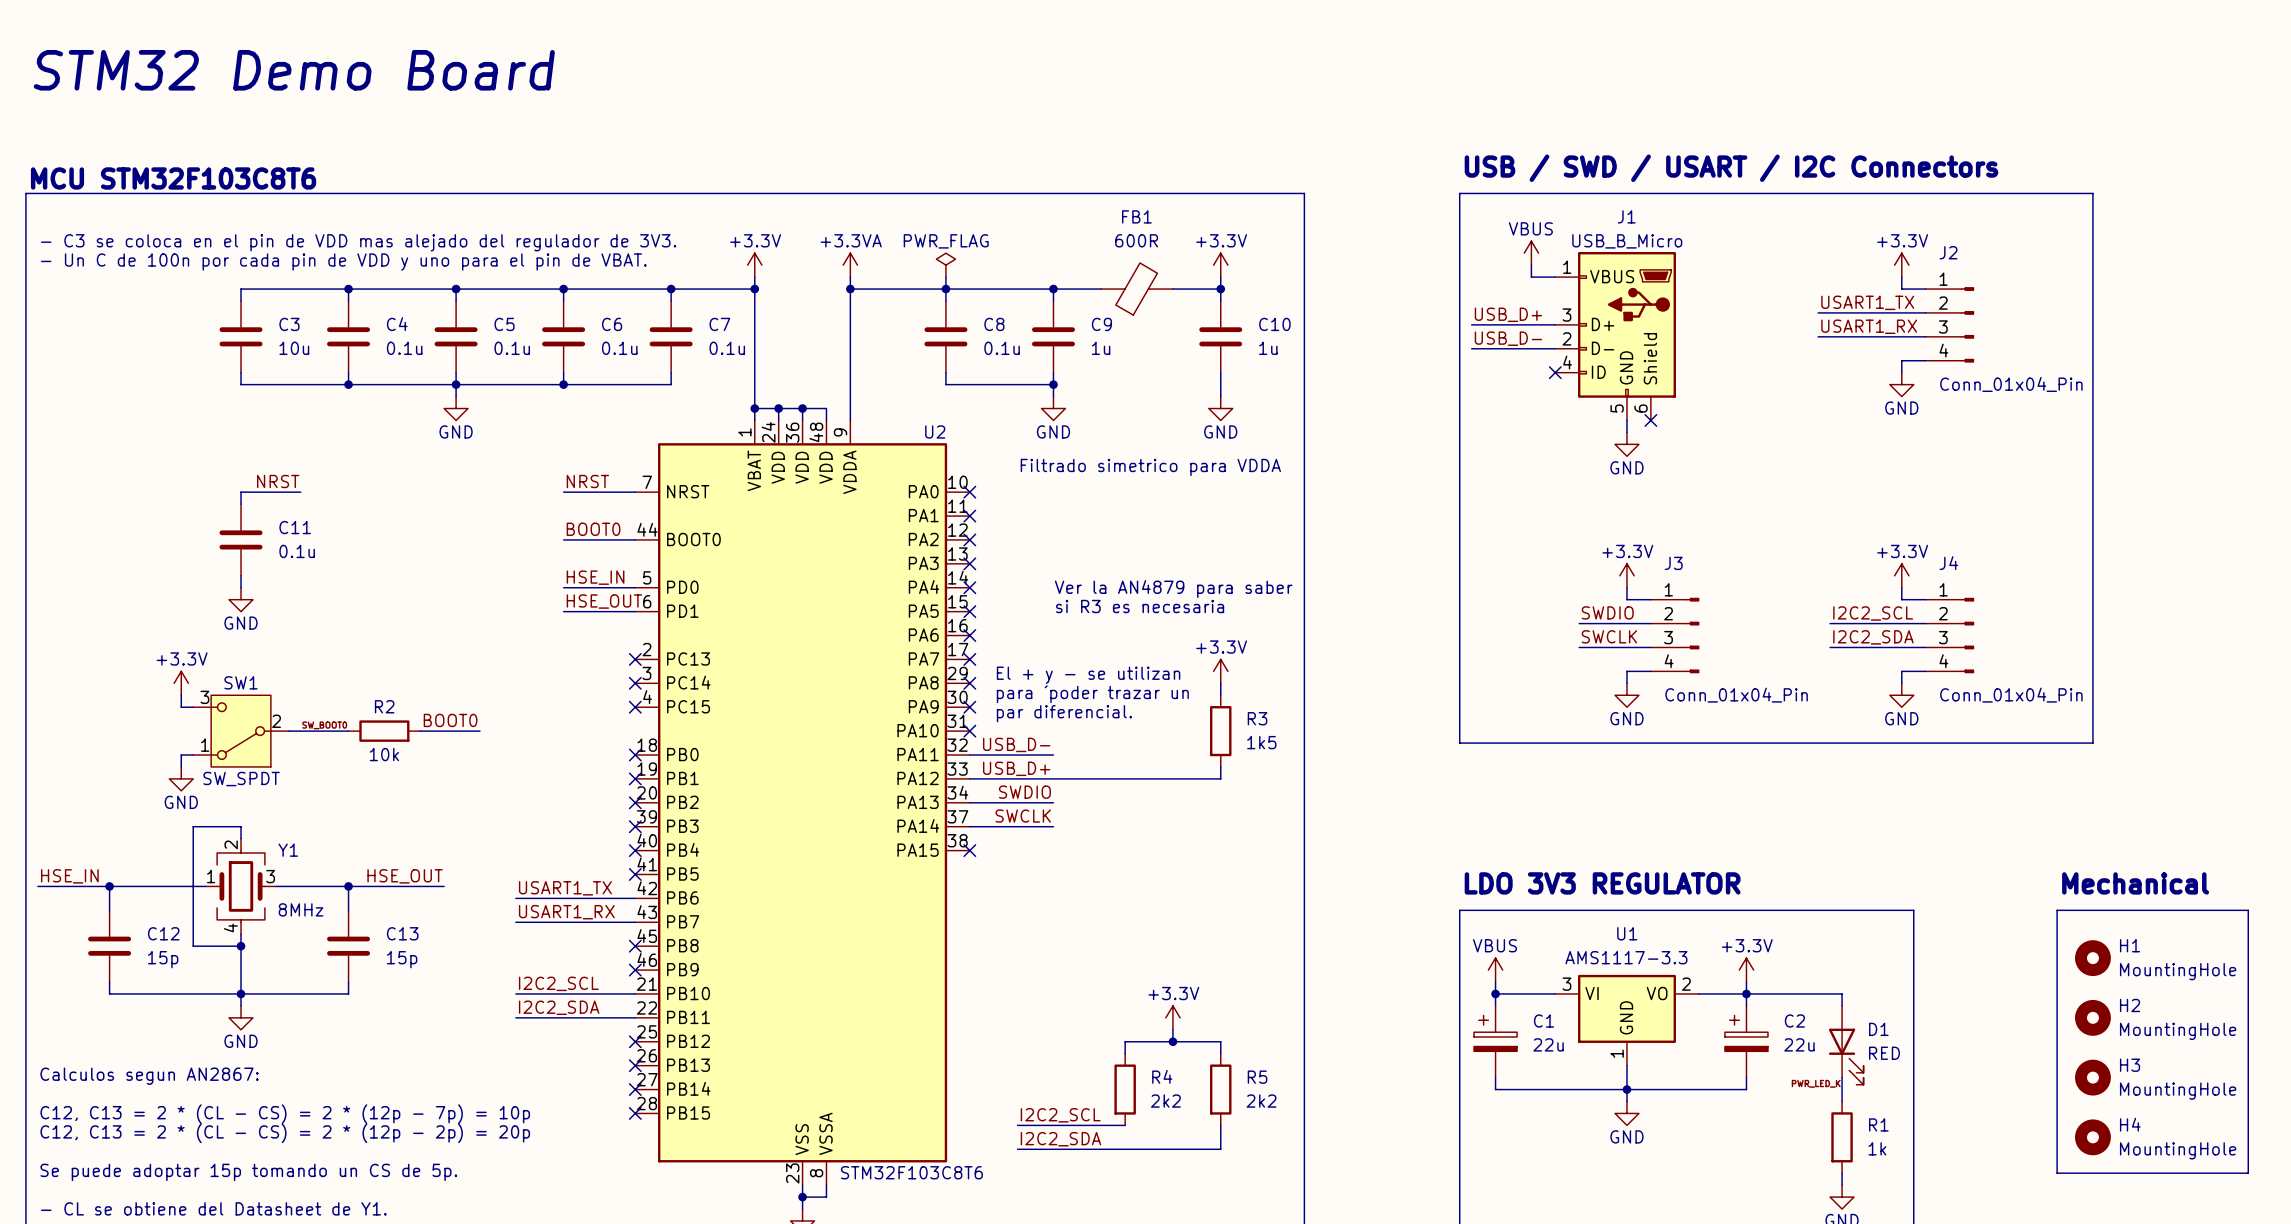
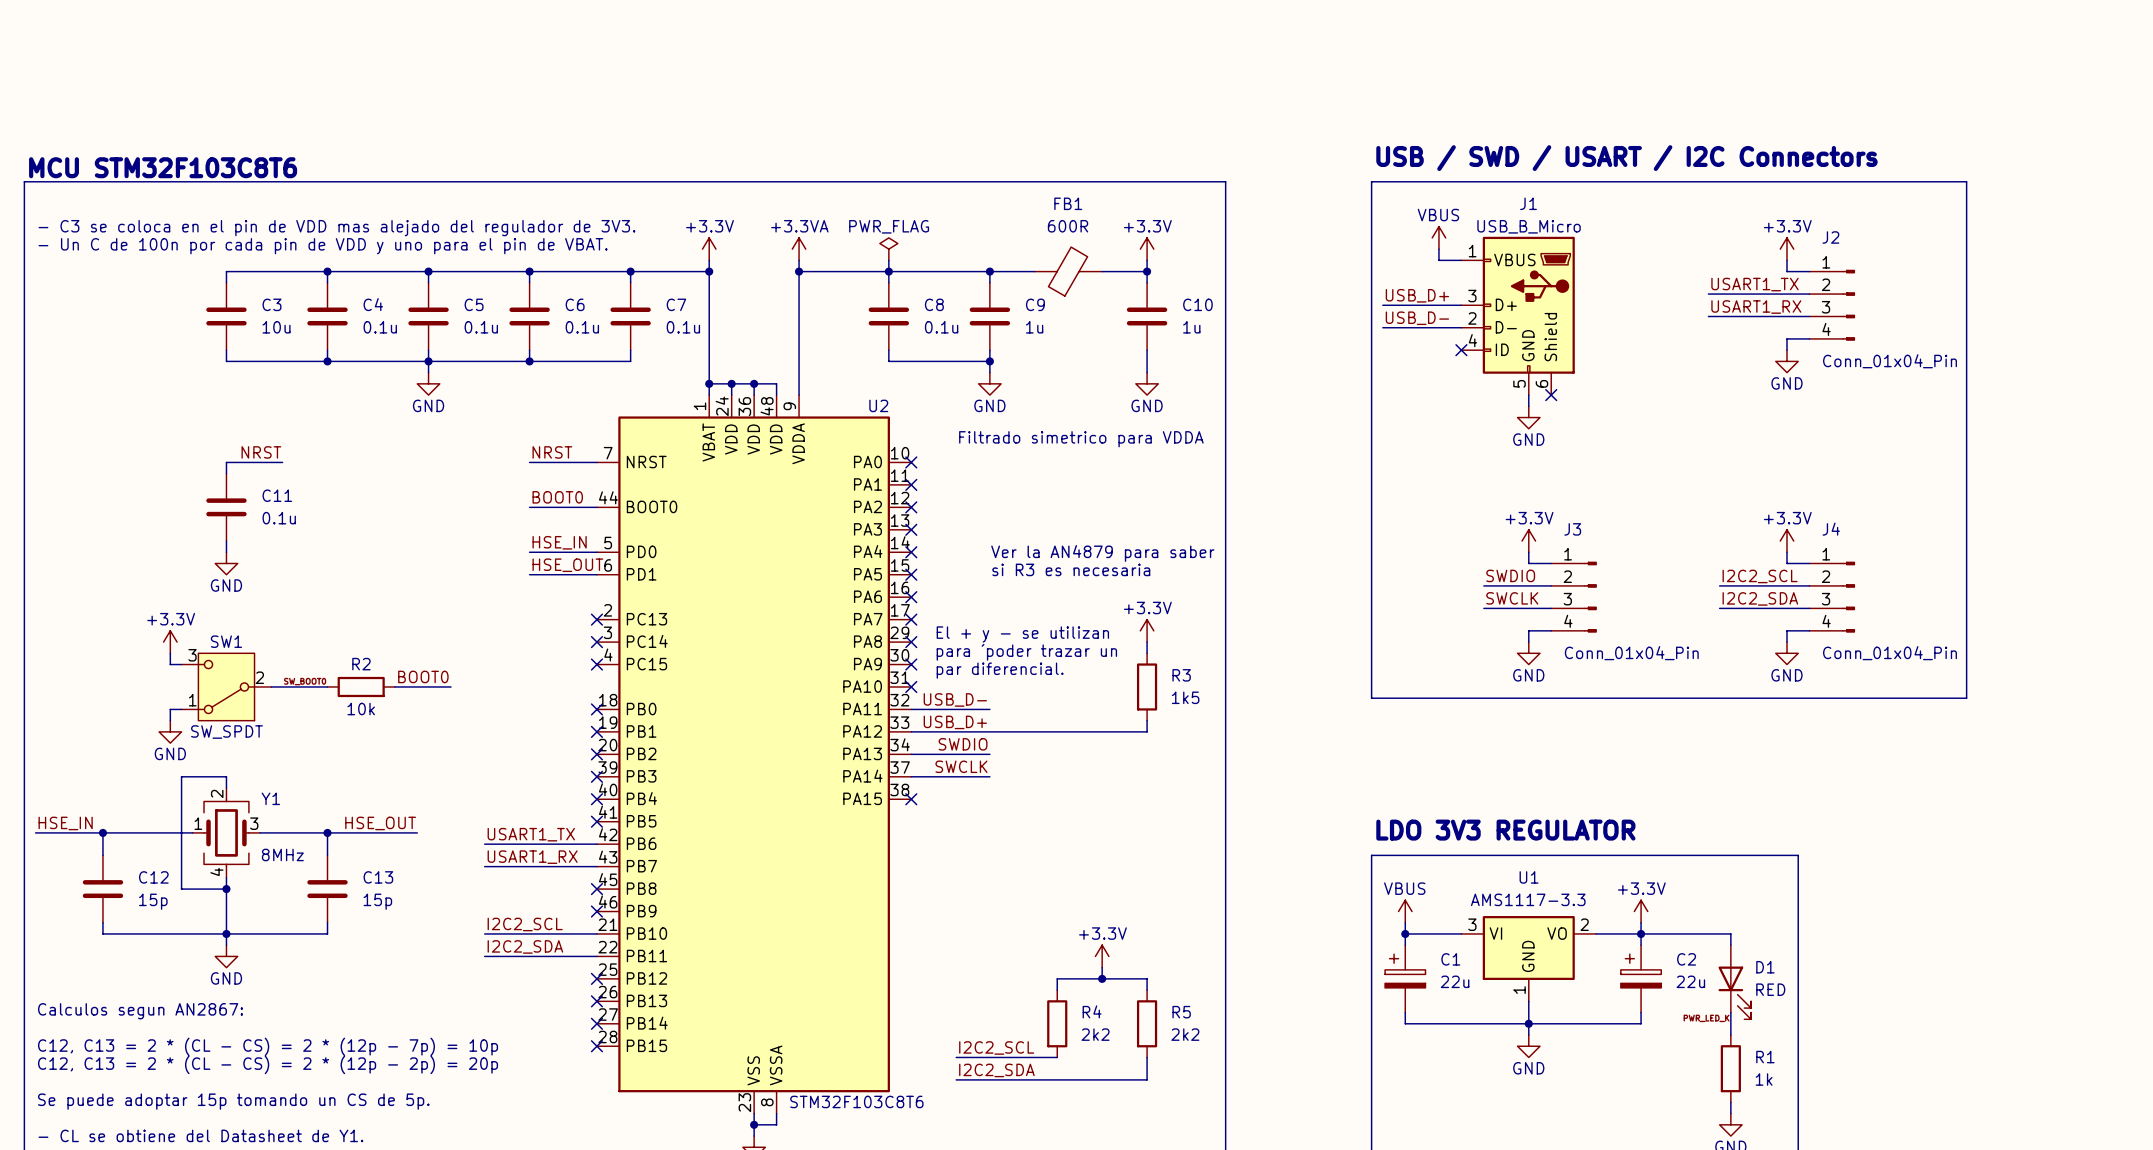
text: STM32 Demo Board (294, 70) -> none
text: Mechanical (2135, 883) -> none
line: (2057, 910) (2248, 910) (2248, 1173) (2057, 1173) (2057, 910) -> none
H1: MountingHole (2092, 958) -> none
H2: MountingHole (2092, 1017) -> none
H3: MountingHole (2092, 1077) -> none
H4: MountingHole (2092, 1137) -> none

